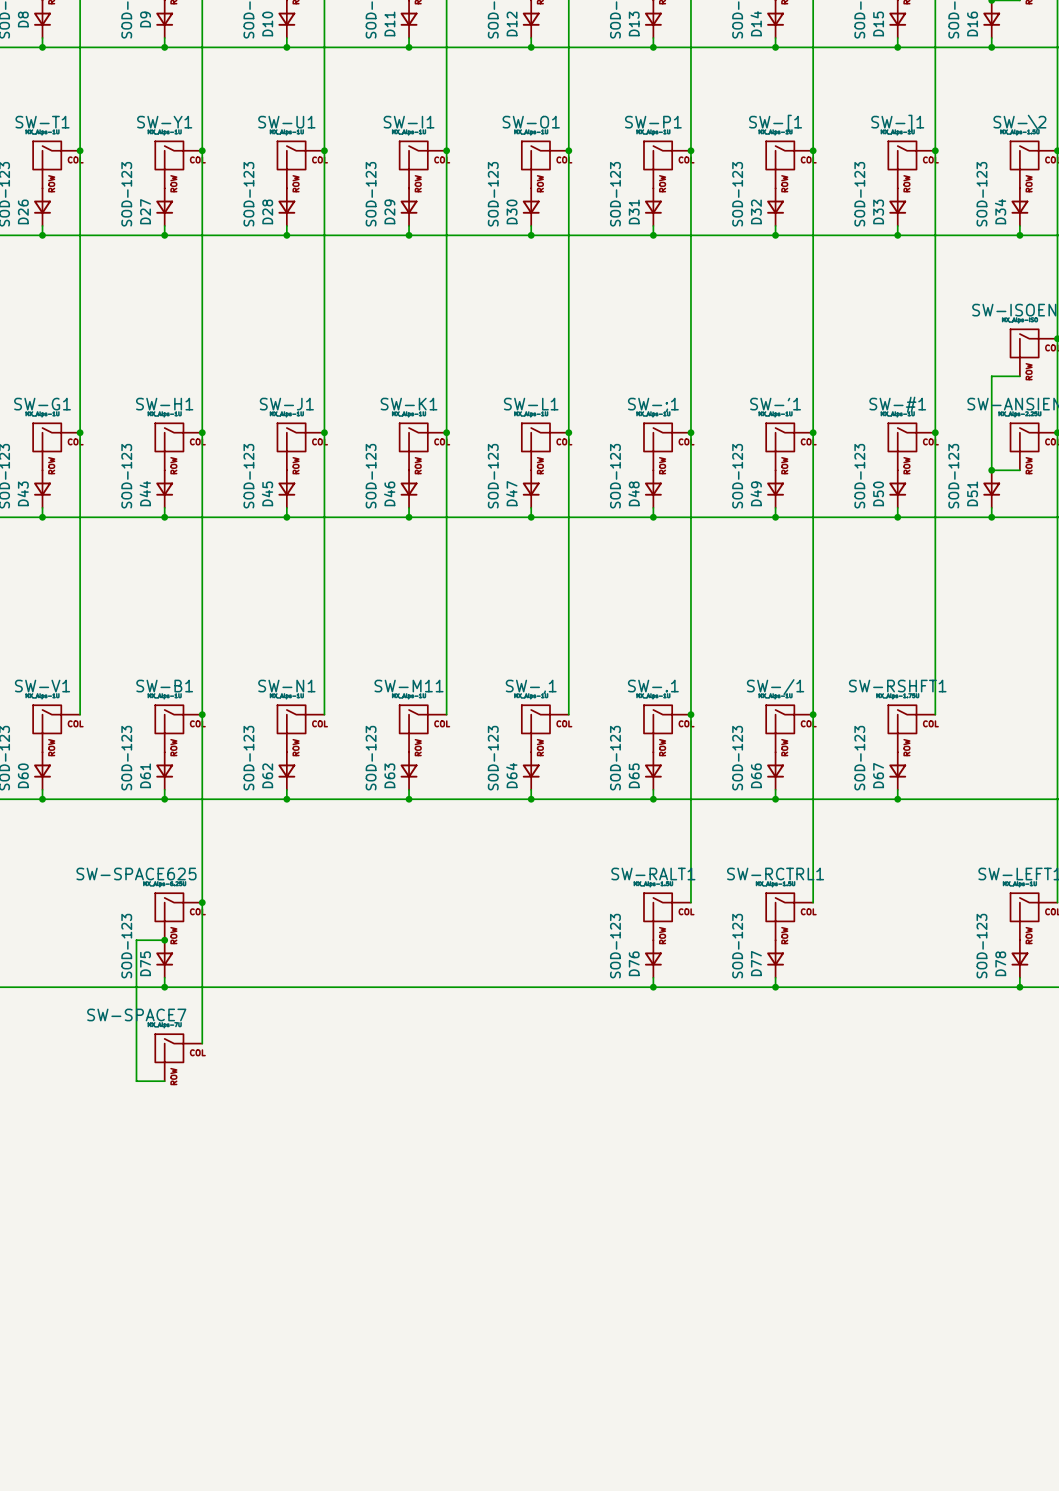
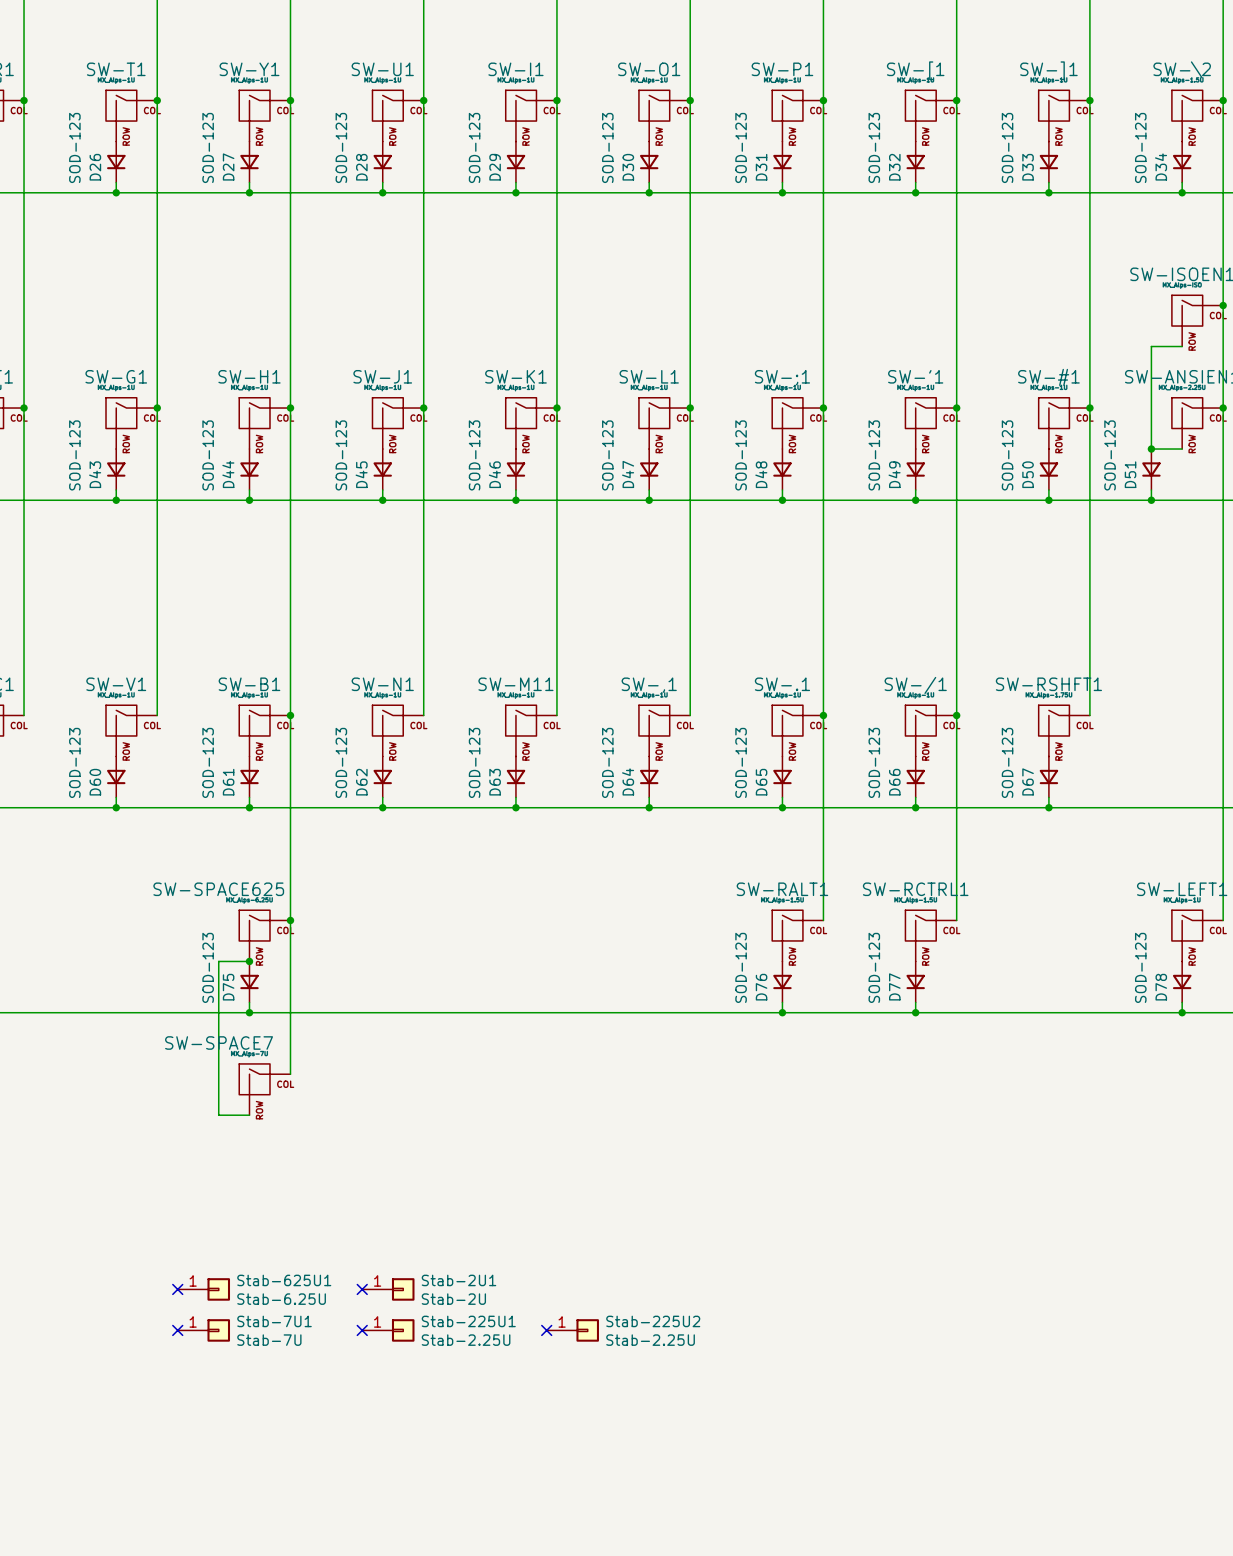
no-connect mark: none -> (177, 1289)
Stab-625U1: none -> Stab-6.25U (203, 1289)
no-connect mark: none -> (362, 1289)
Stab-2U1: none -> Stab-2U (388, 1289)
no-connect mark: none -> (177, 1330)
Stab-7U1: none -> Stab-7U (203, 1330)
no-connect mark: none -> (362, 1330)
Stab-225U1: none -> Stab-2.25U (388, 1330)
no-connect mark: none -> (546, 1330)
Stab-225U2: none -> Stab-2.25U (572, 1330)

